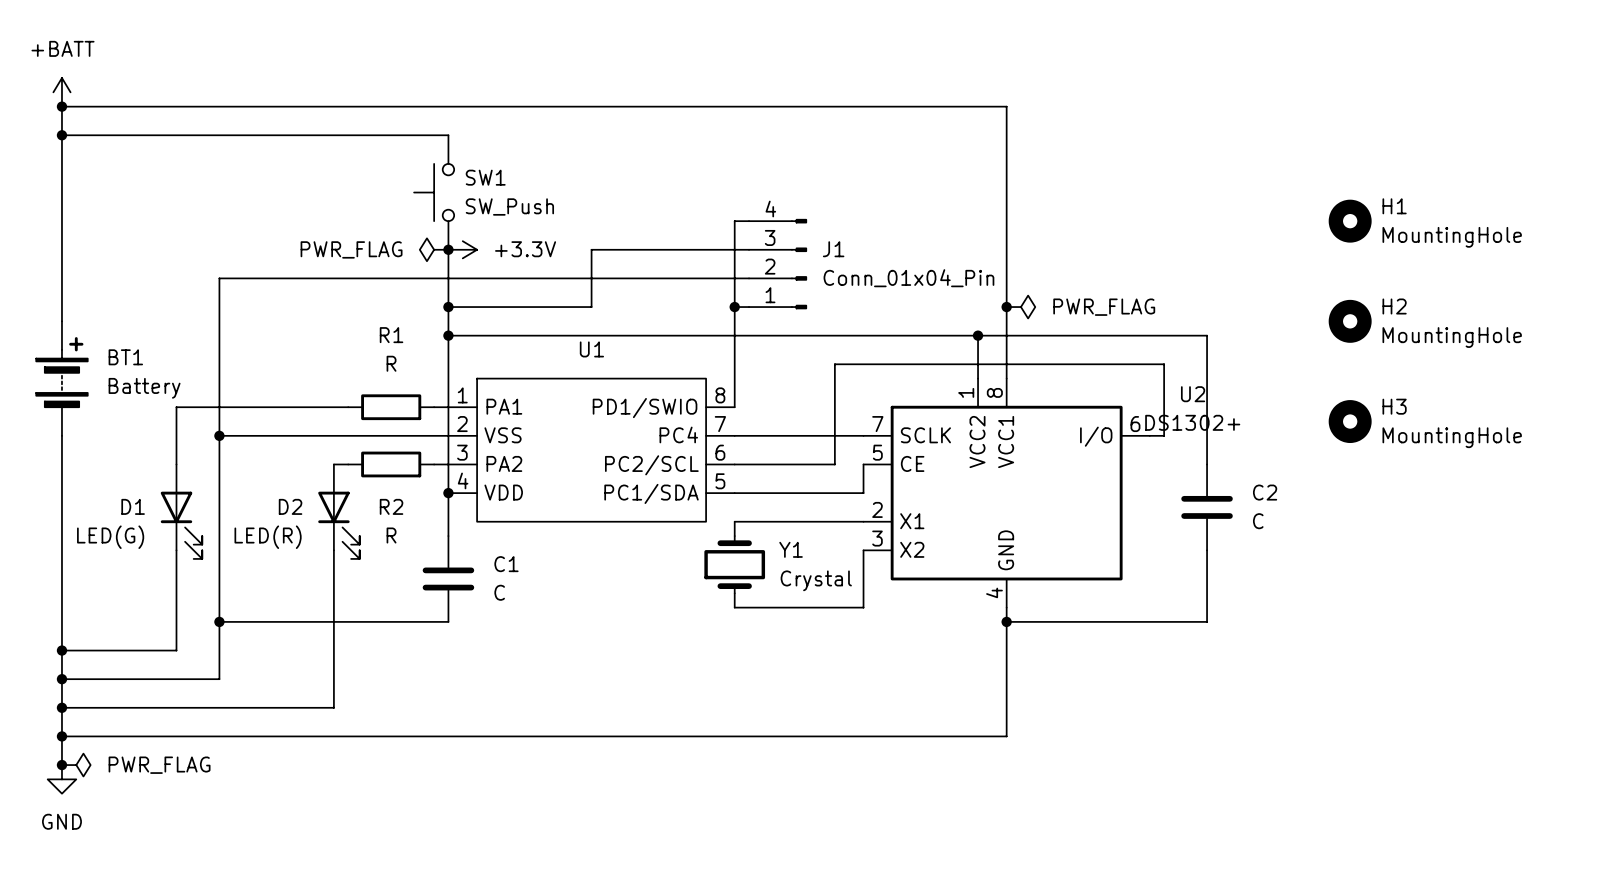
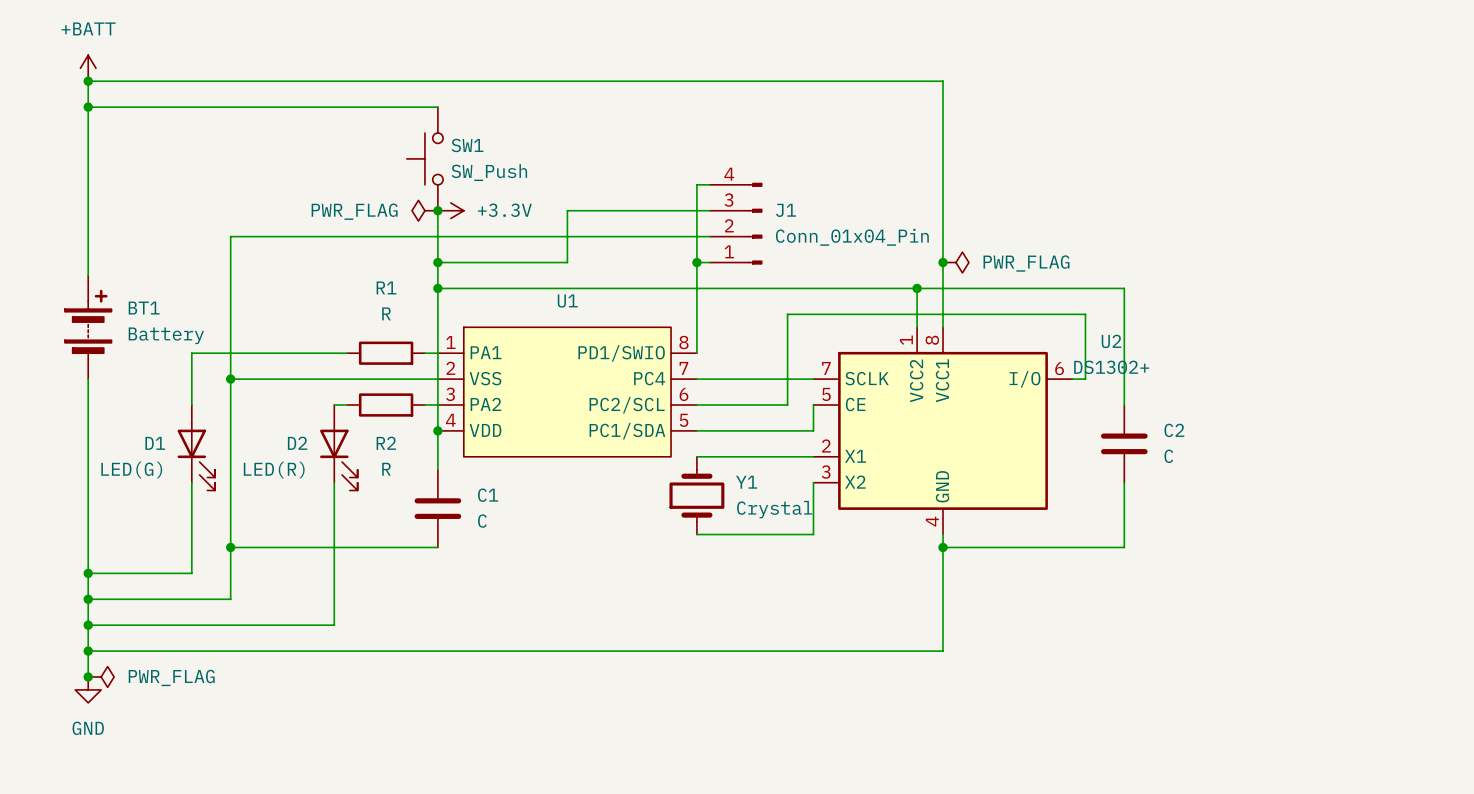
H1: MountingHole (1350, 221) -> none
H2: MountingHole (1350, 321) -> none
H3: MountingHole (1350, 421) -> none

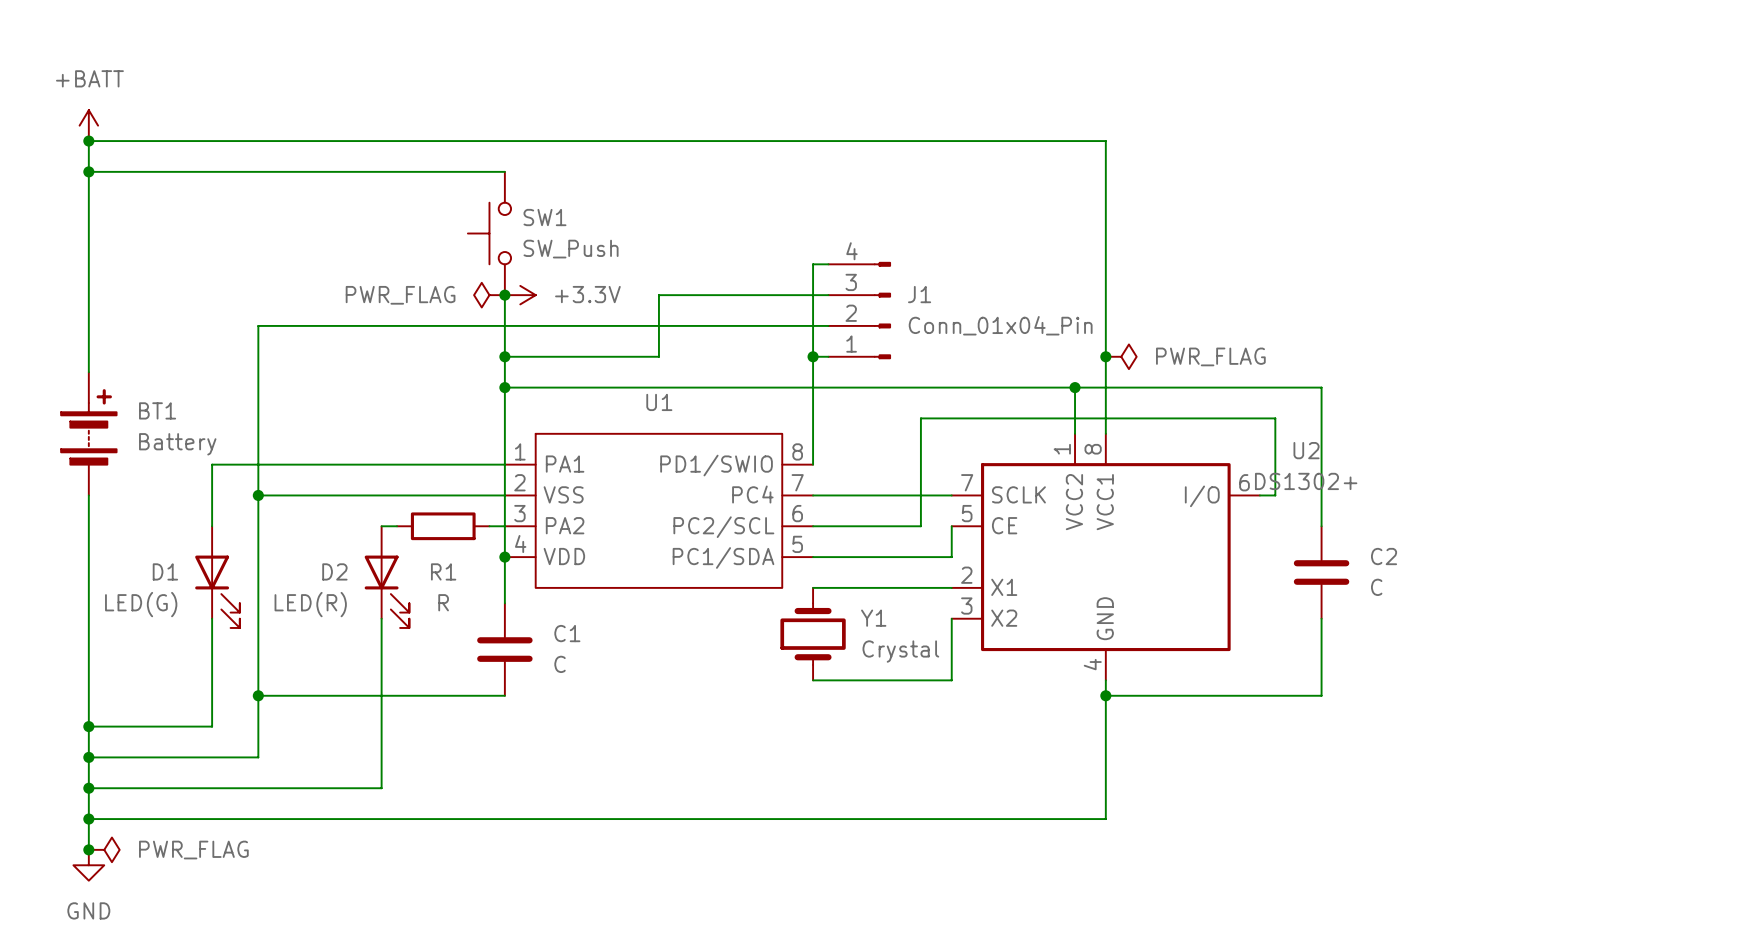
wire: none -> (397, 464) (489, 464)
R1: R (386, 353) -> none
R2 name: R2 (386, 443) -> R1 (443, 571)

